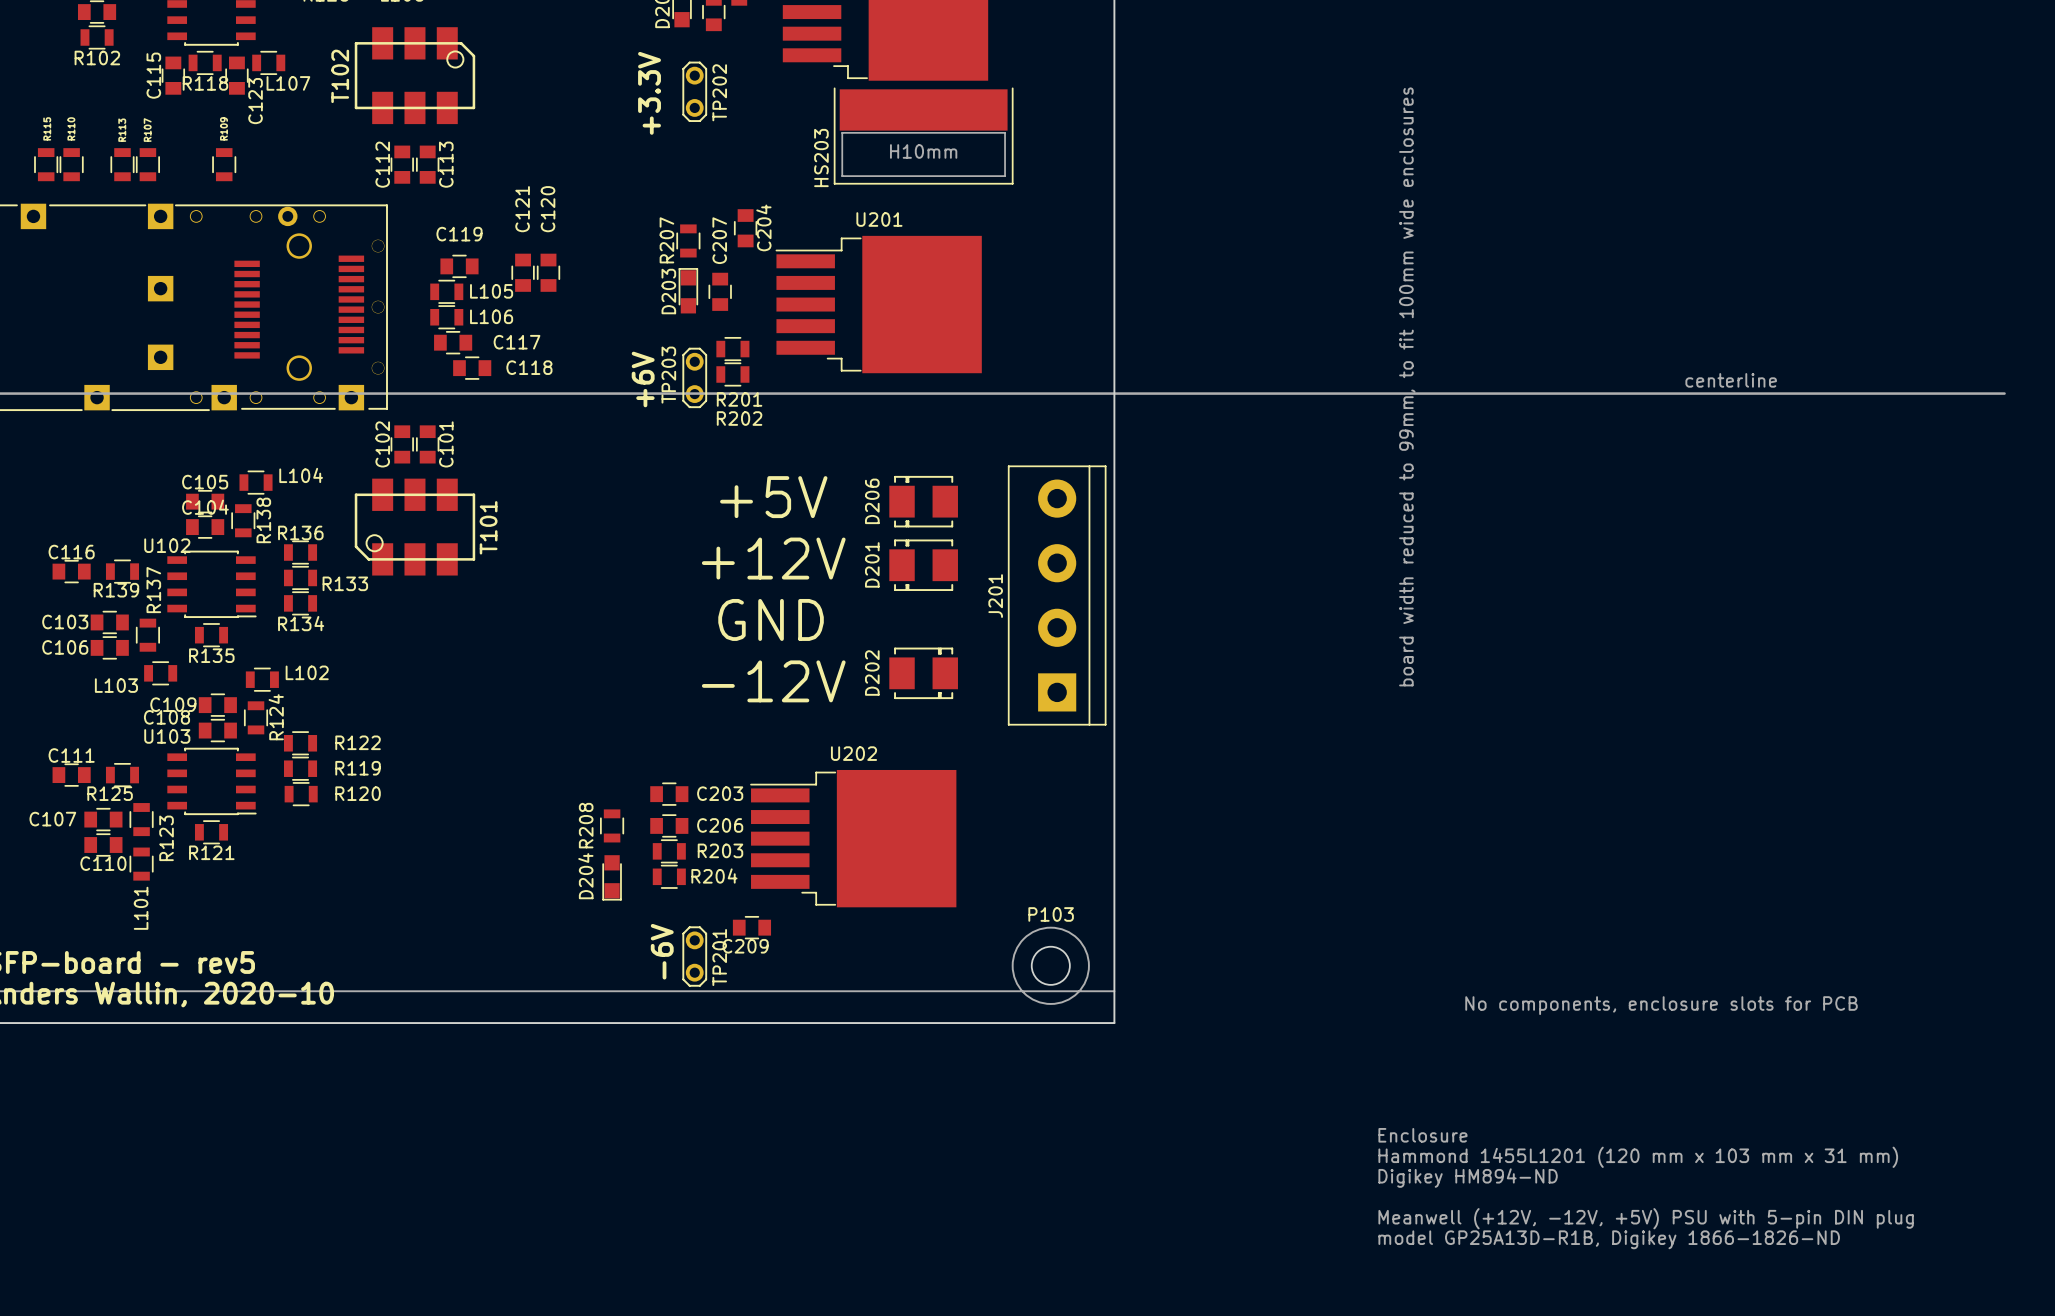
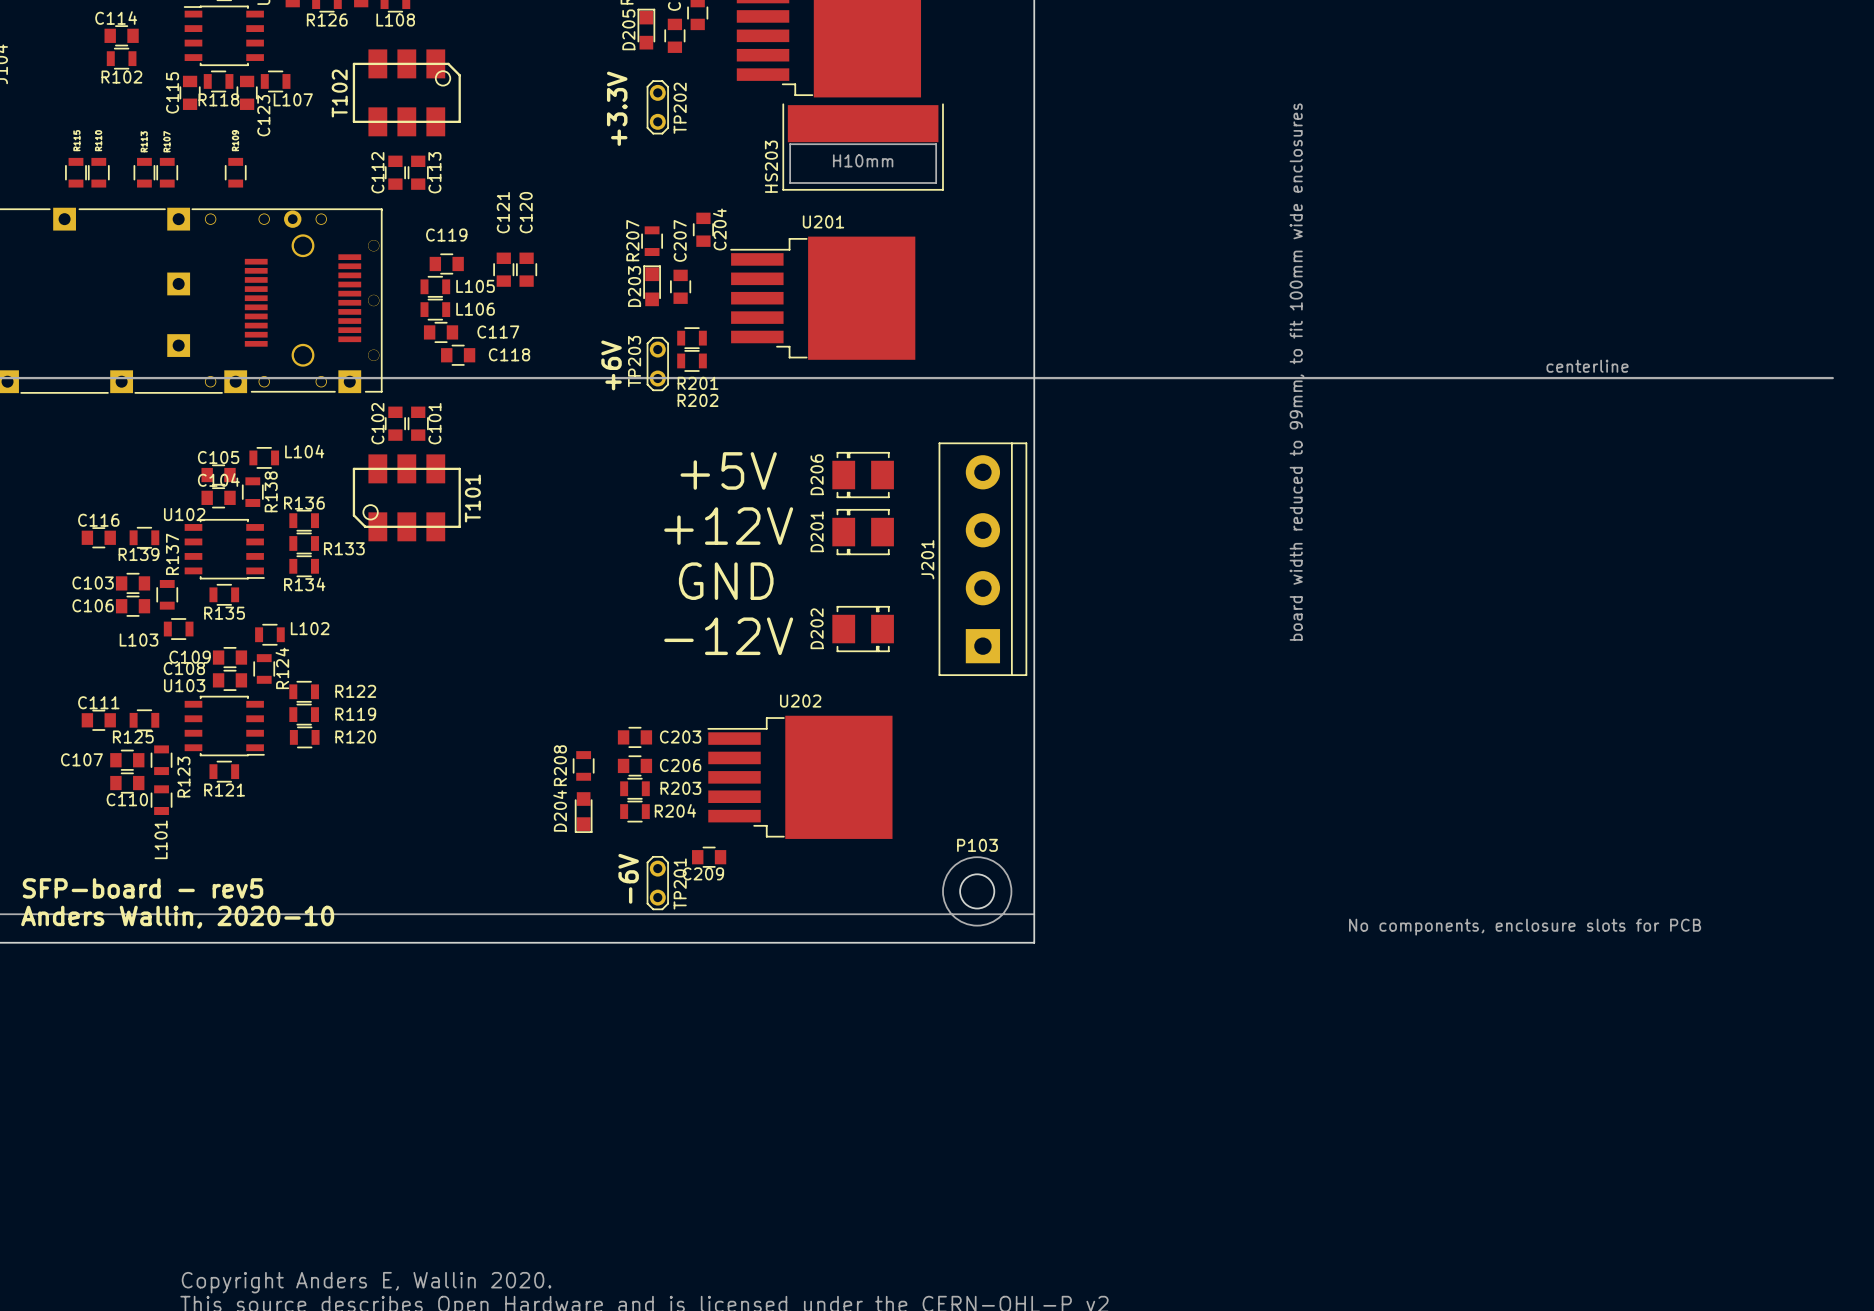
text: Enclosure (1422, 1135) -> none
text: Hammond 1455L1201 (120 mm x 103 mm x 31 mm) (1638, 1157) -> none
text: Digikey HM894-ND (1468, 1178) -> none
text: Meanwell (+12V, -12V, +5V) PSU with 5-pin DIN plug (1646, 1218) -> none
text: model GP25A13D-R1B, Digikey 1866-1826-ND (1609, 1239) -> none

